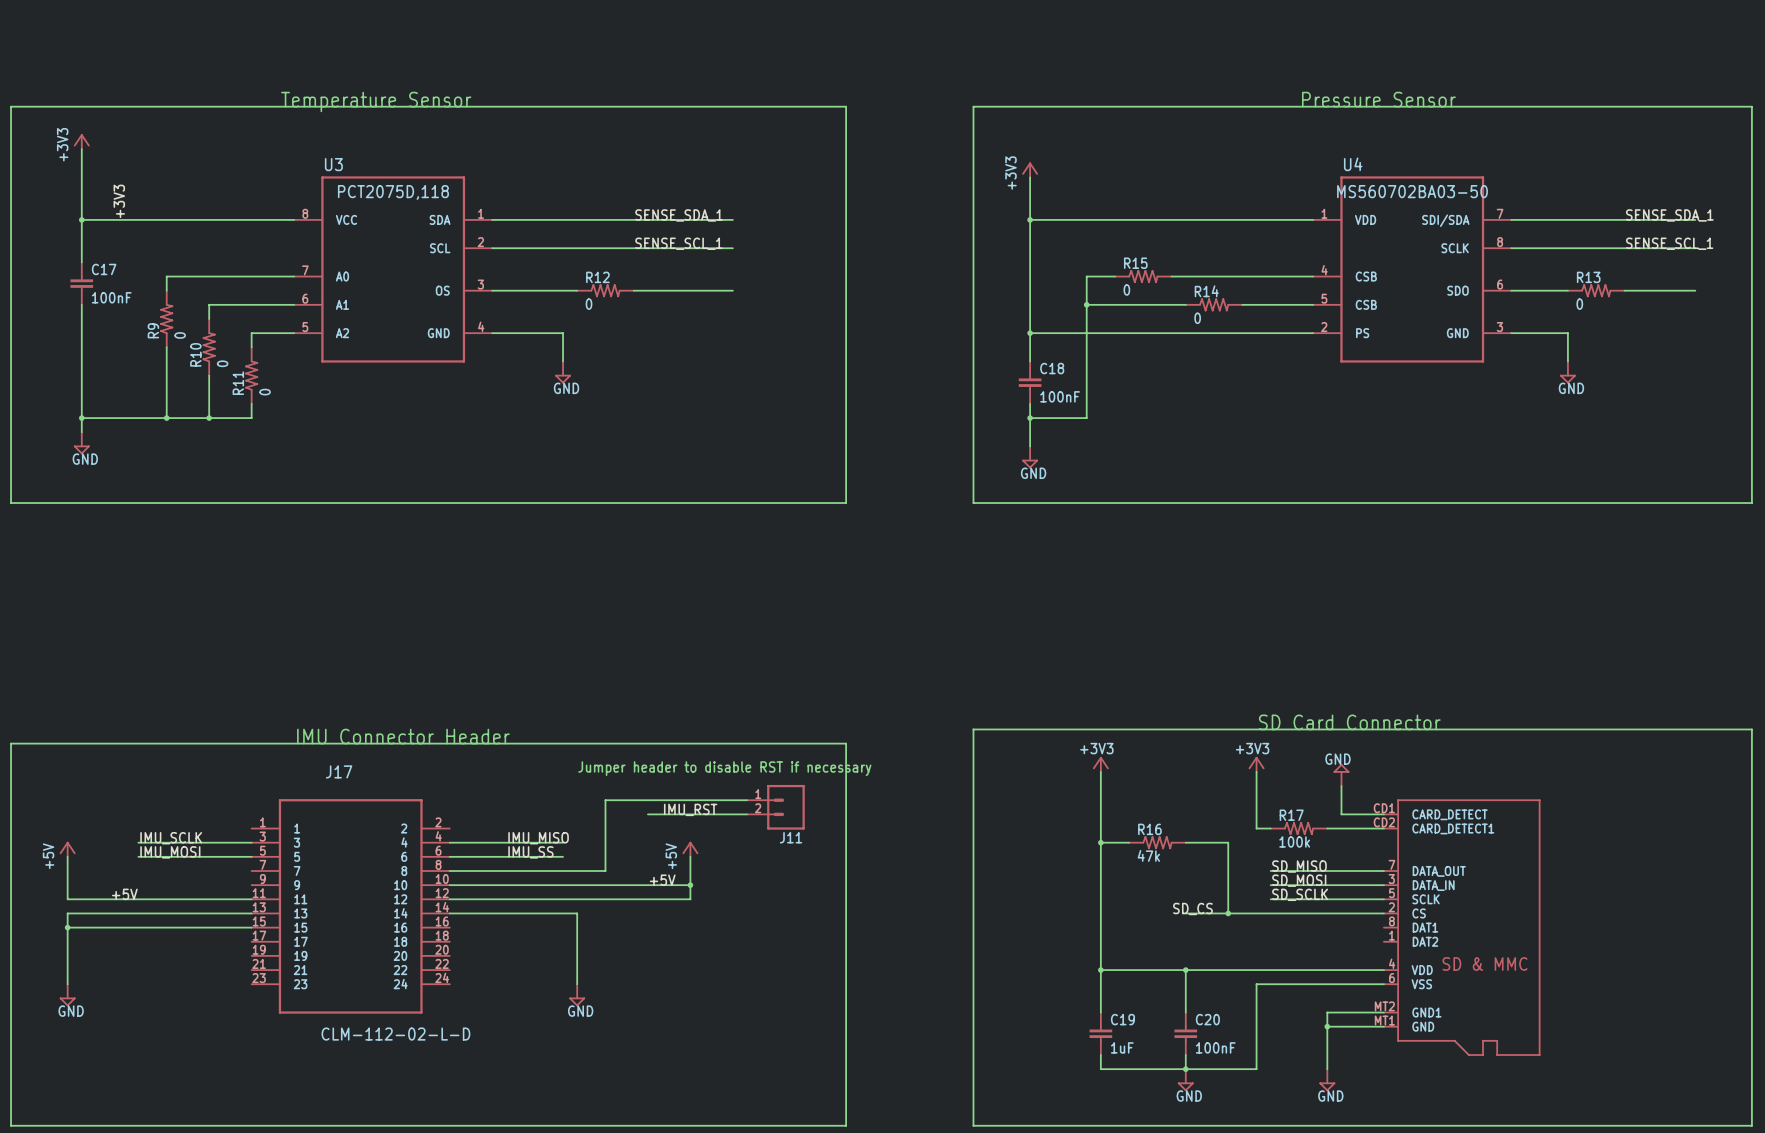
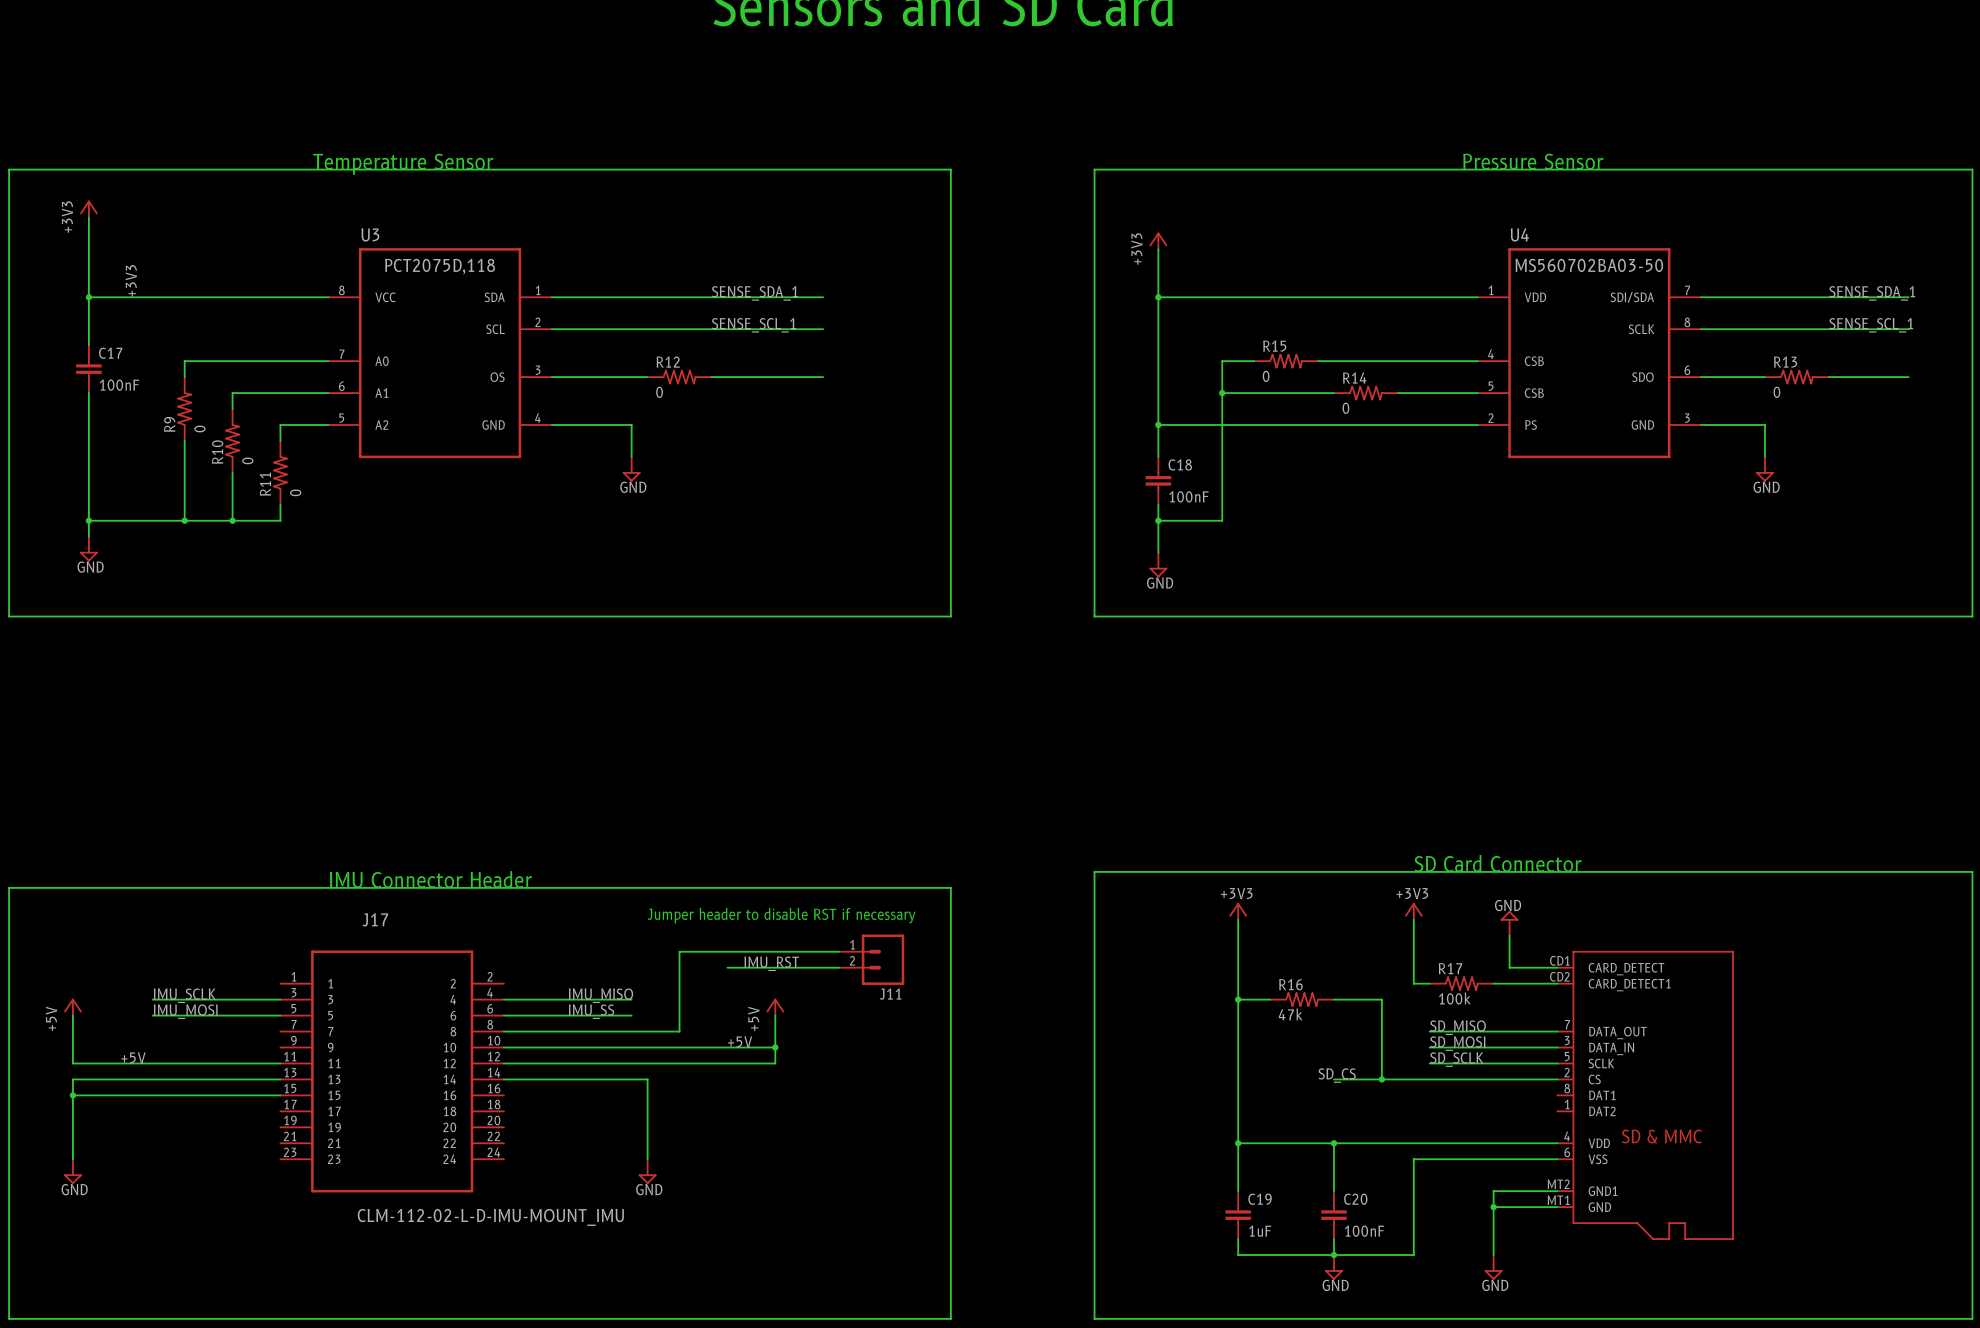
J17 value: CLM-112-02-L-D (395, 1034) -> CLM-112-02-L-D-IMU-MOUNT_IMU (490, 1217)

